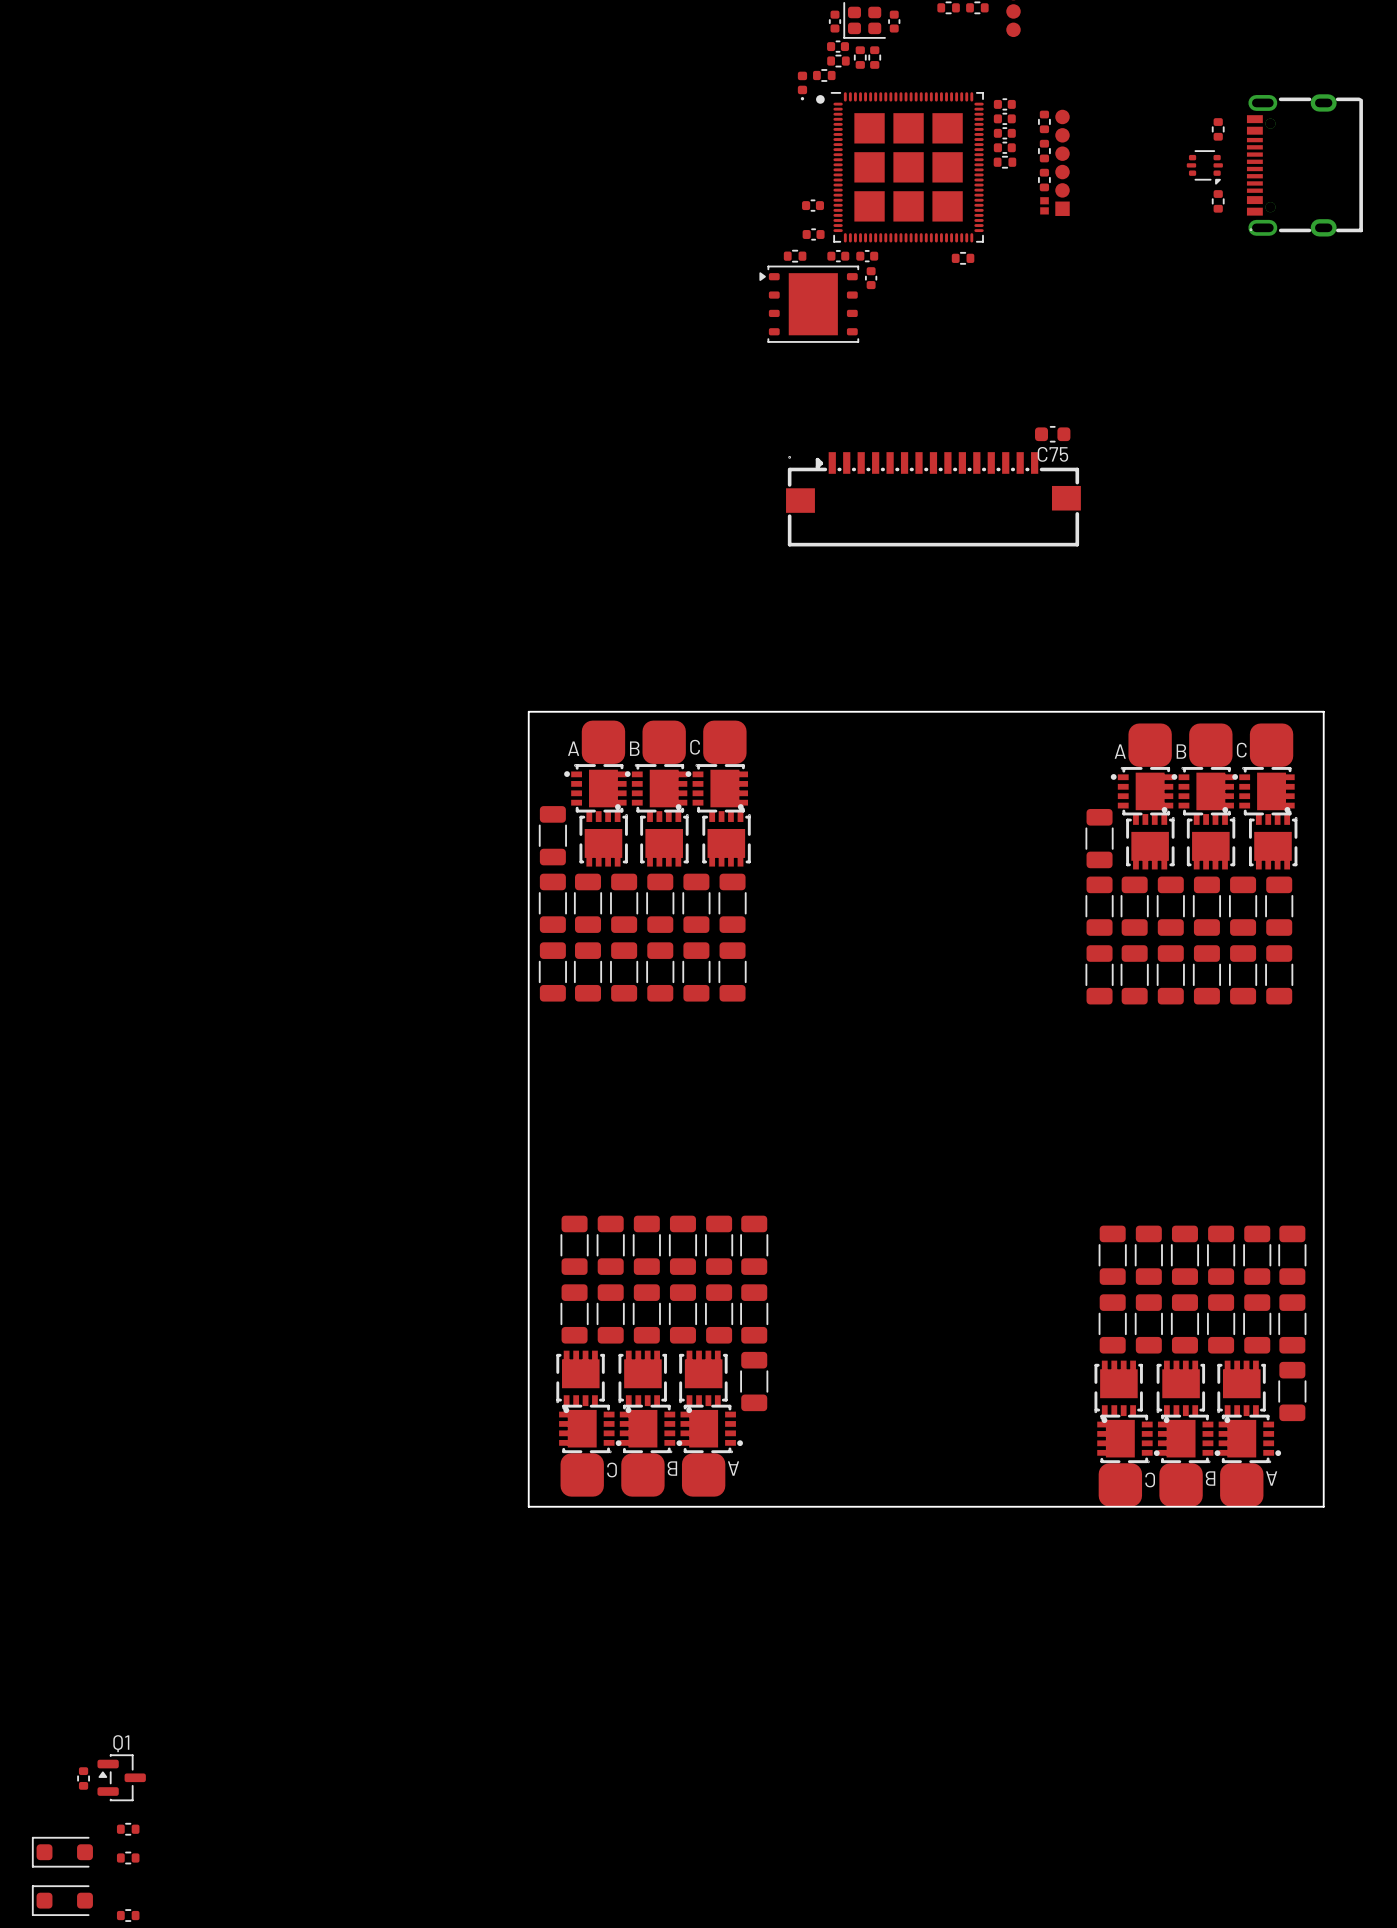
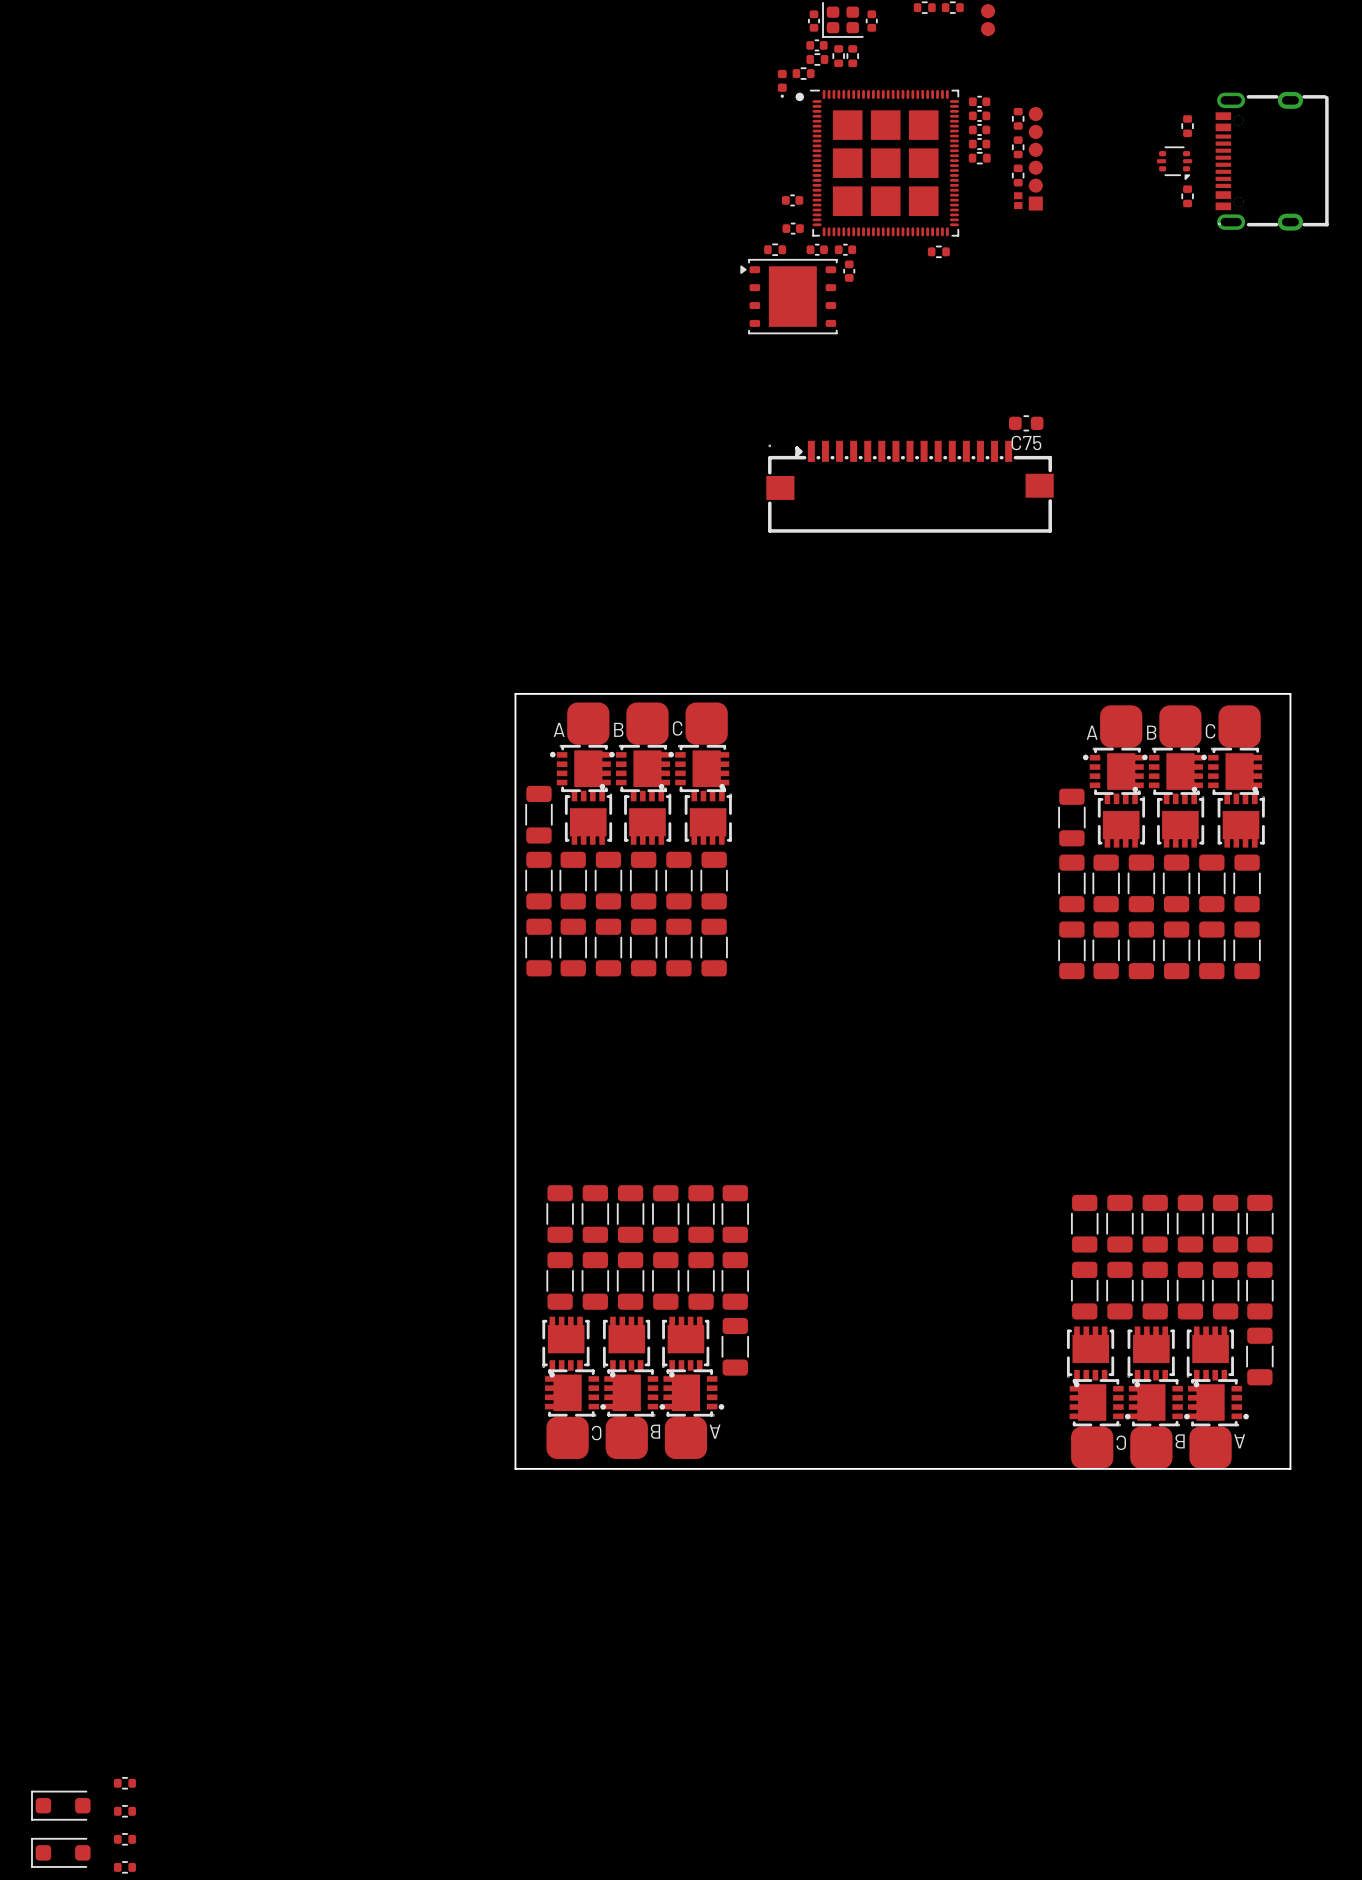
Q1: (121, 1777) -> none
part rotation: 0° (83, 1778) -> 90° clockwise (124, 1839)
part position: (83, 1778) -> (124, 1839)

